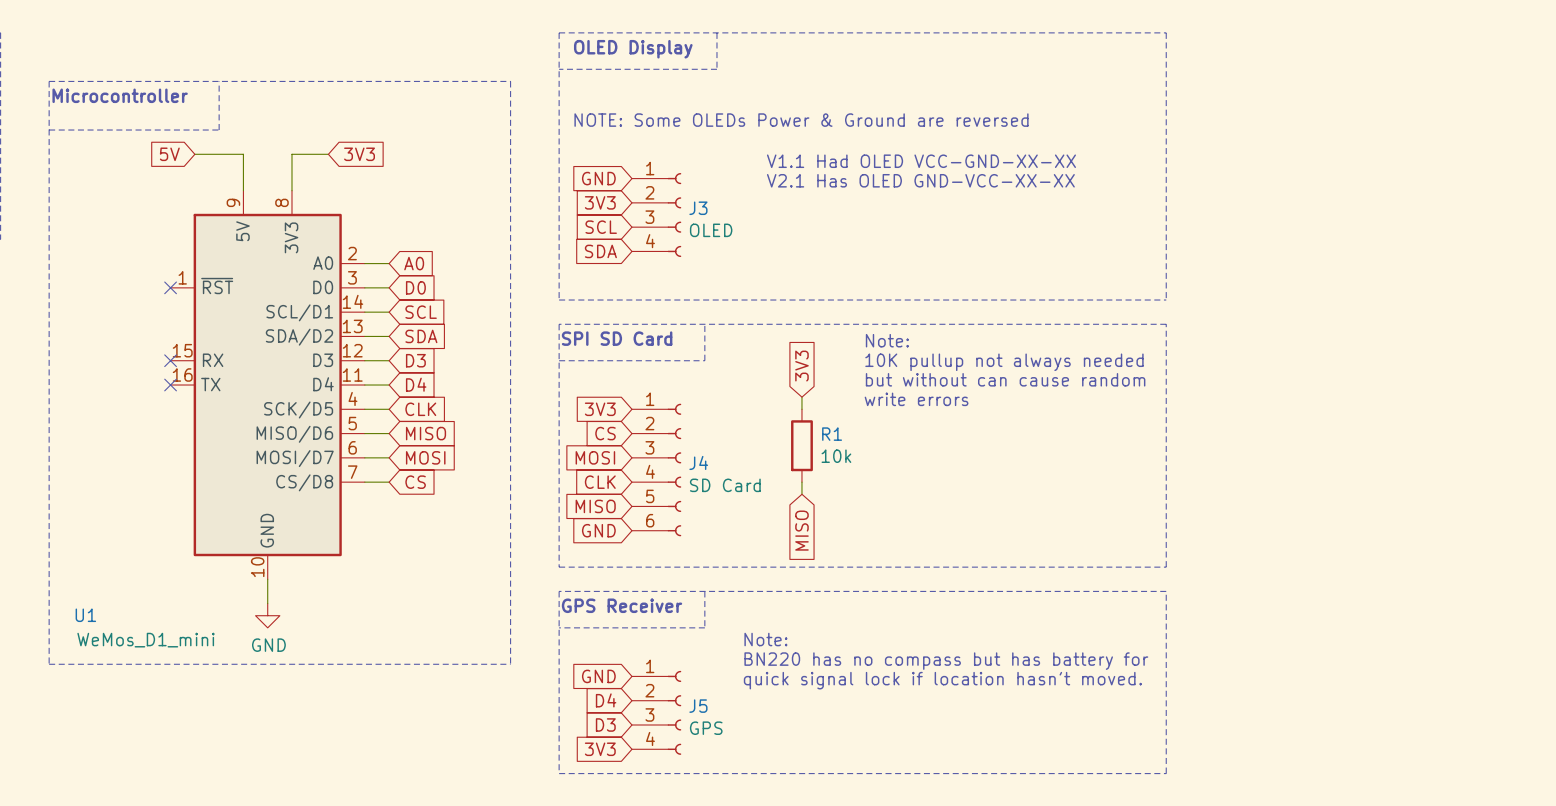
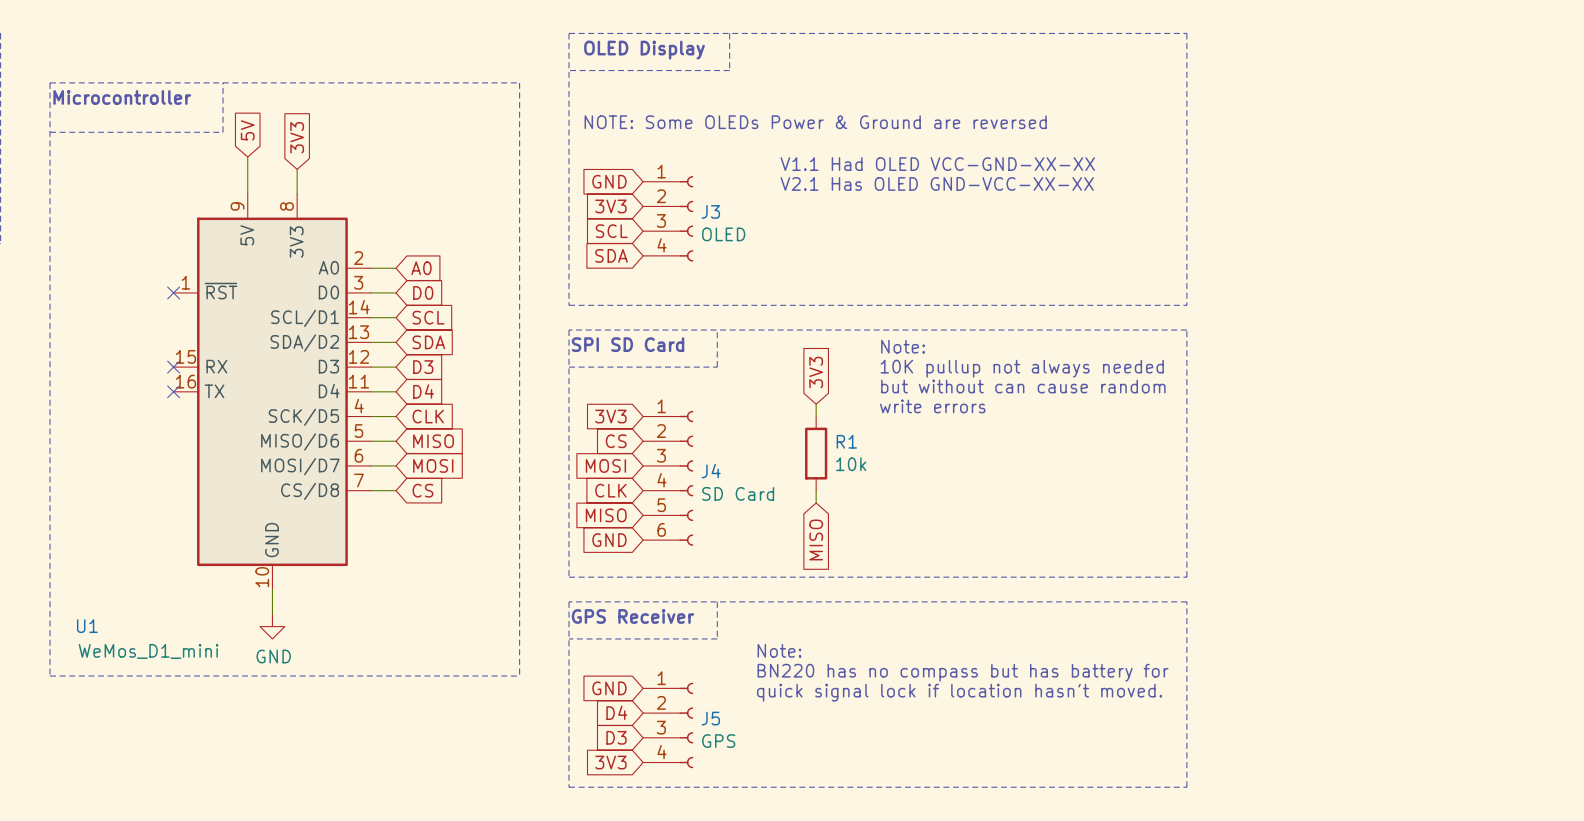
global label rotation: 0° (169, 154) -> 90° clockwise (247, 130)
global label position: 5V (169, 154) -> 5V (247, 130)
wire: (194, 154) (243, 154) -> none
wire: (328, 154) (291, 154) (291, 166) -> none
global label rotation: 0° (359, 154) -> 90° counterclockwise (297, 137)
global label position: 3V3 (359, 154) -> 3V3 (297, 137)

